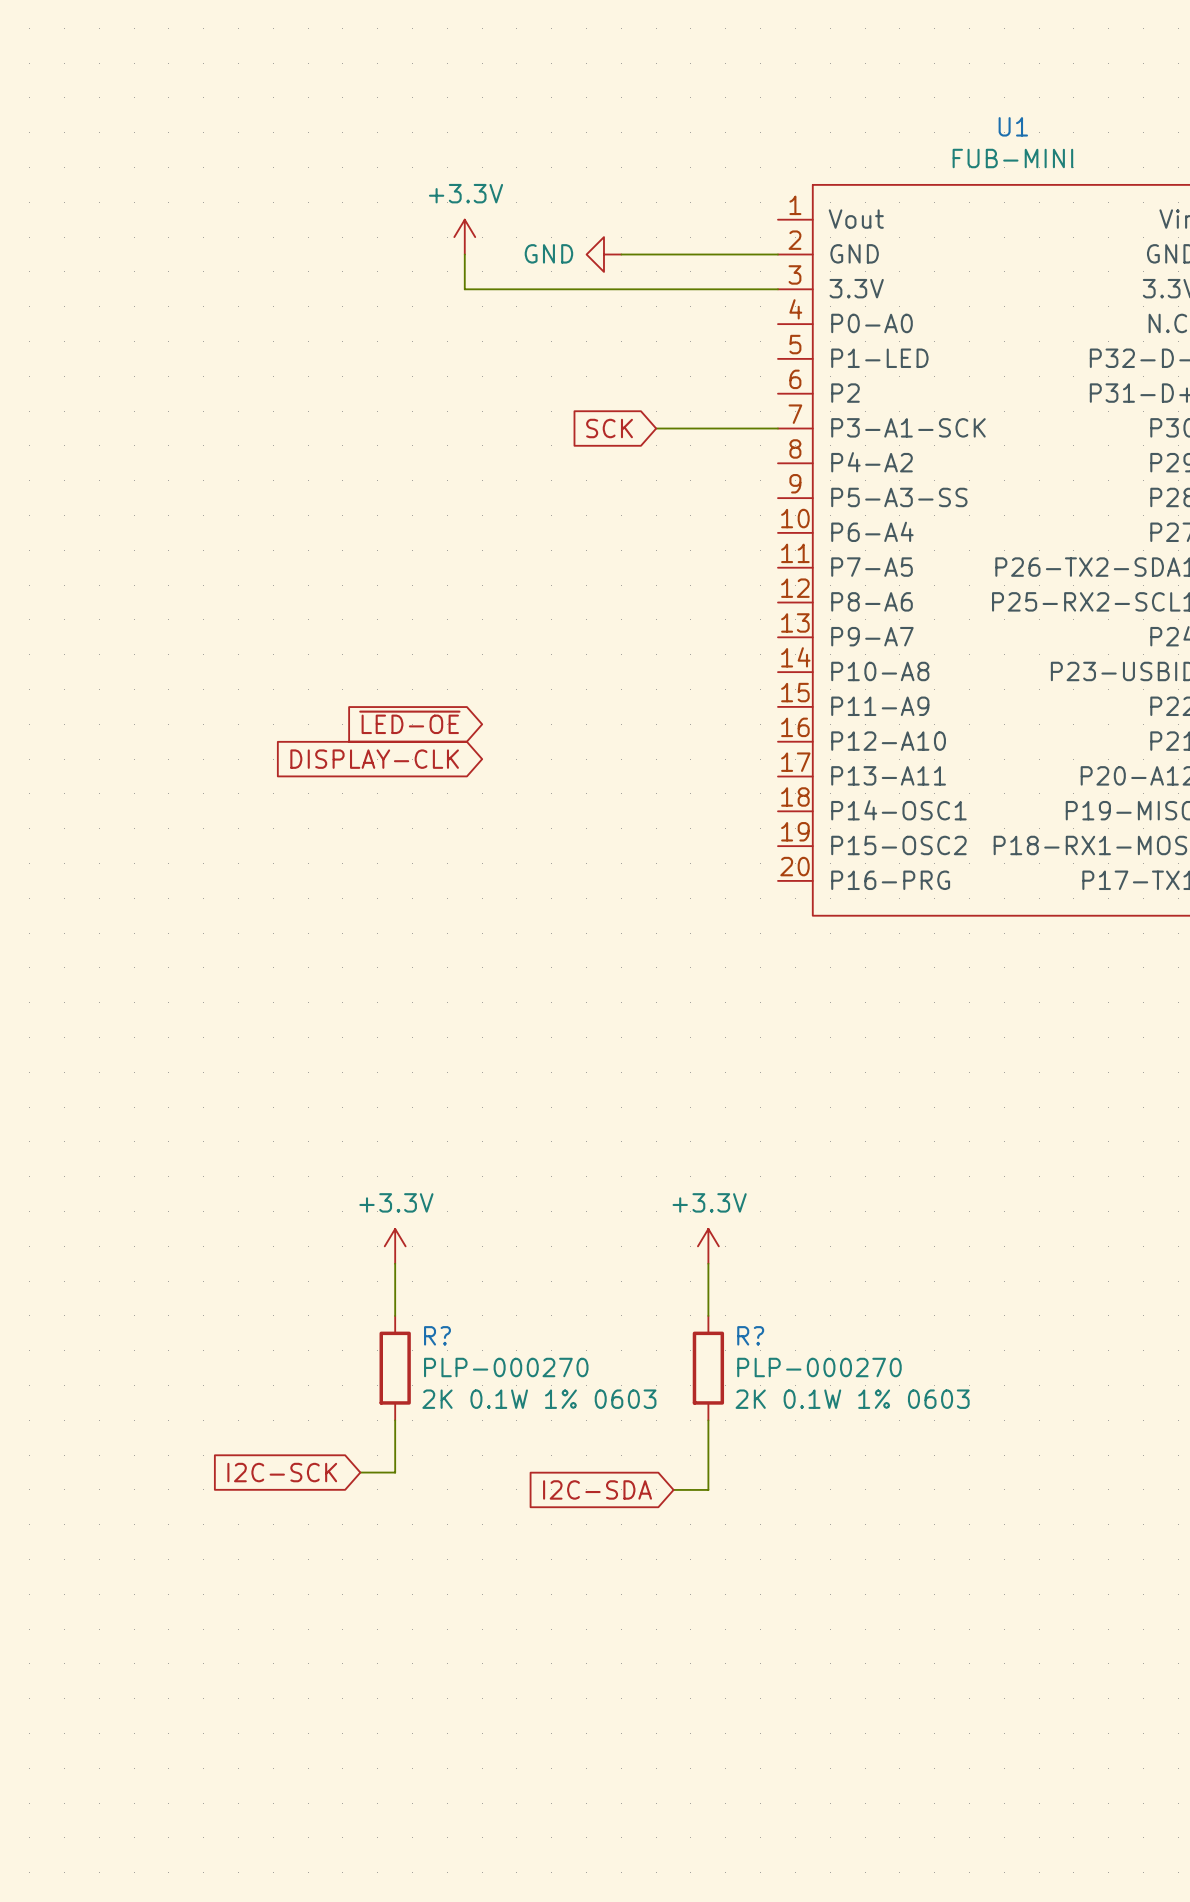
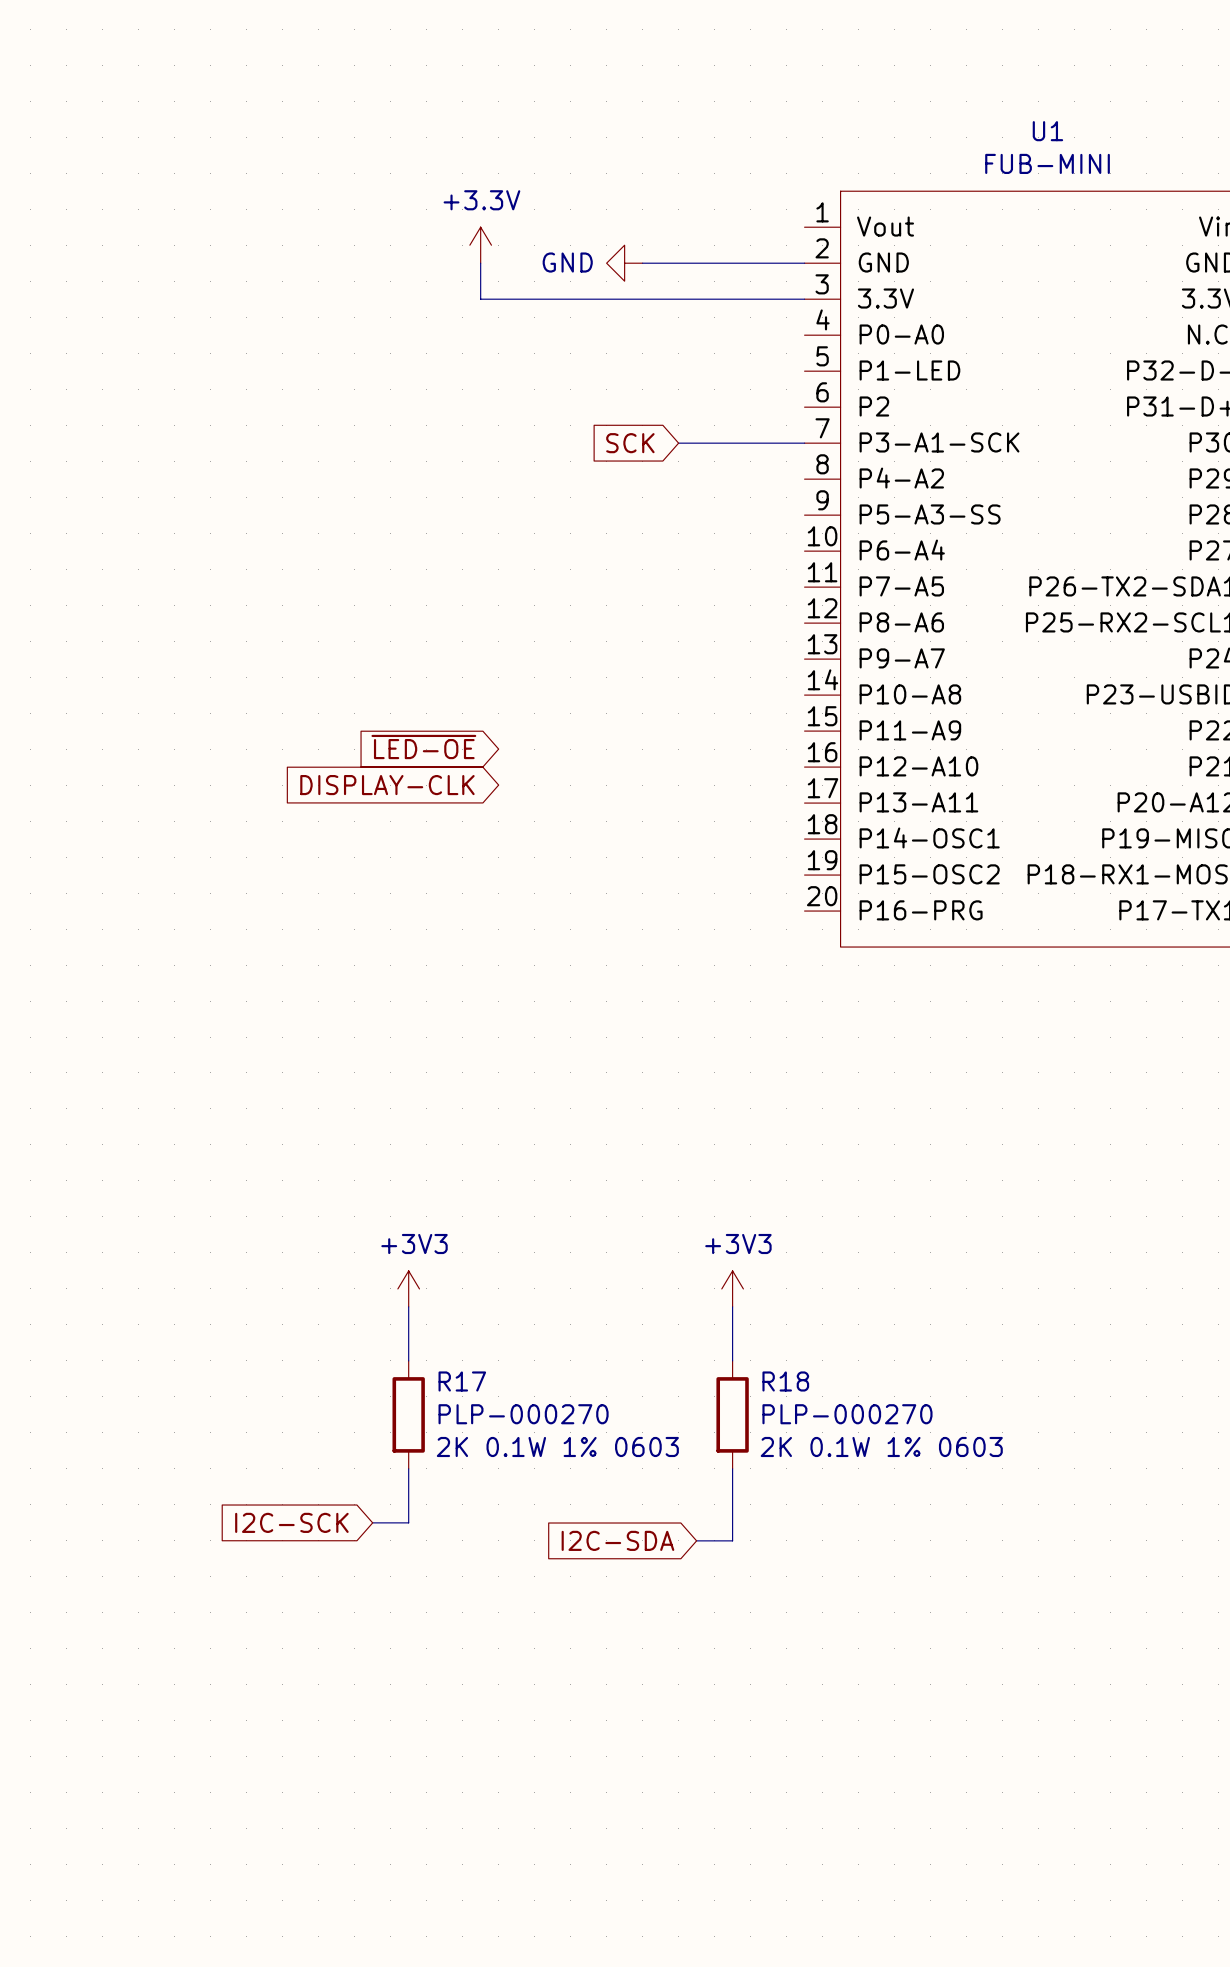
power symbol: +3.3V (395, 1246) -> +3V3 (408, 1288)
power symbol: +3.3V (708, 1246) -> +3V3 (732, 1288)
R? name: R? (437, 1335) -> R17 (462, 1381)
R? name: R? (750, 1335) -> R18 (785, 1381)

